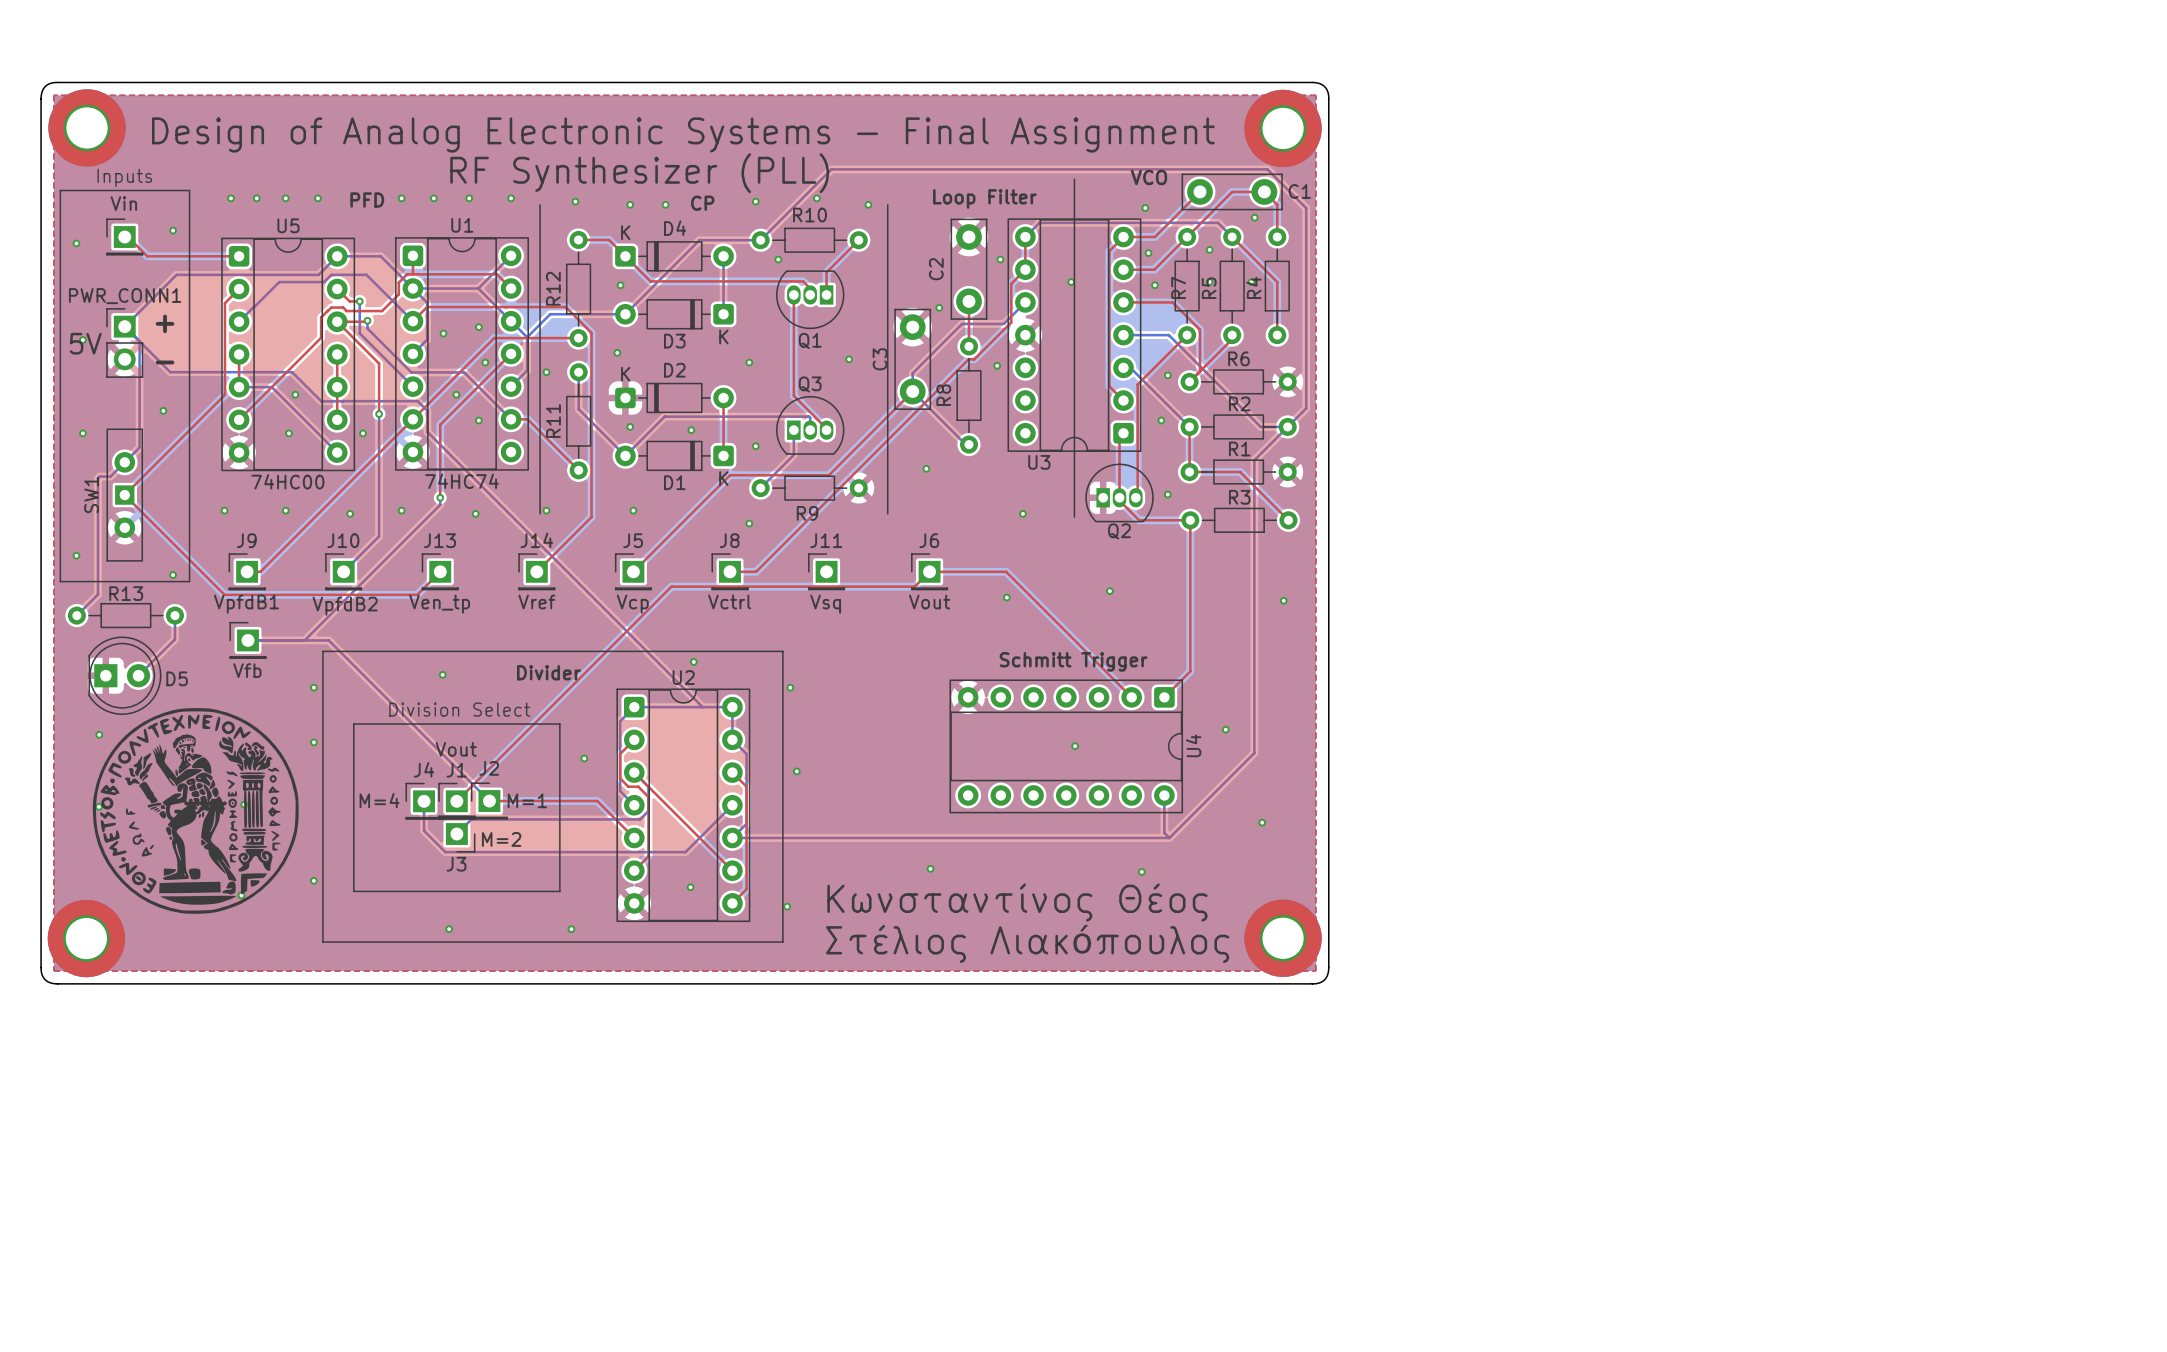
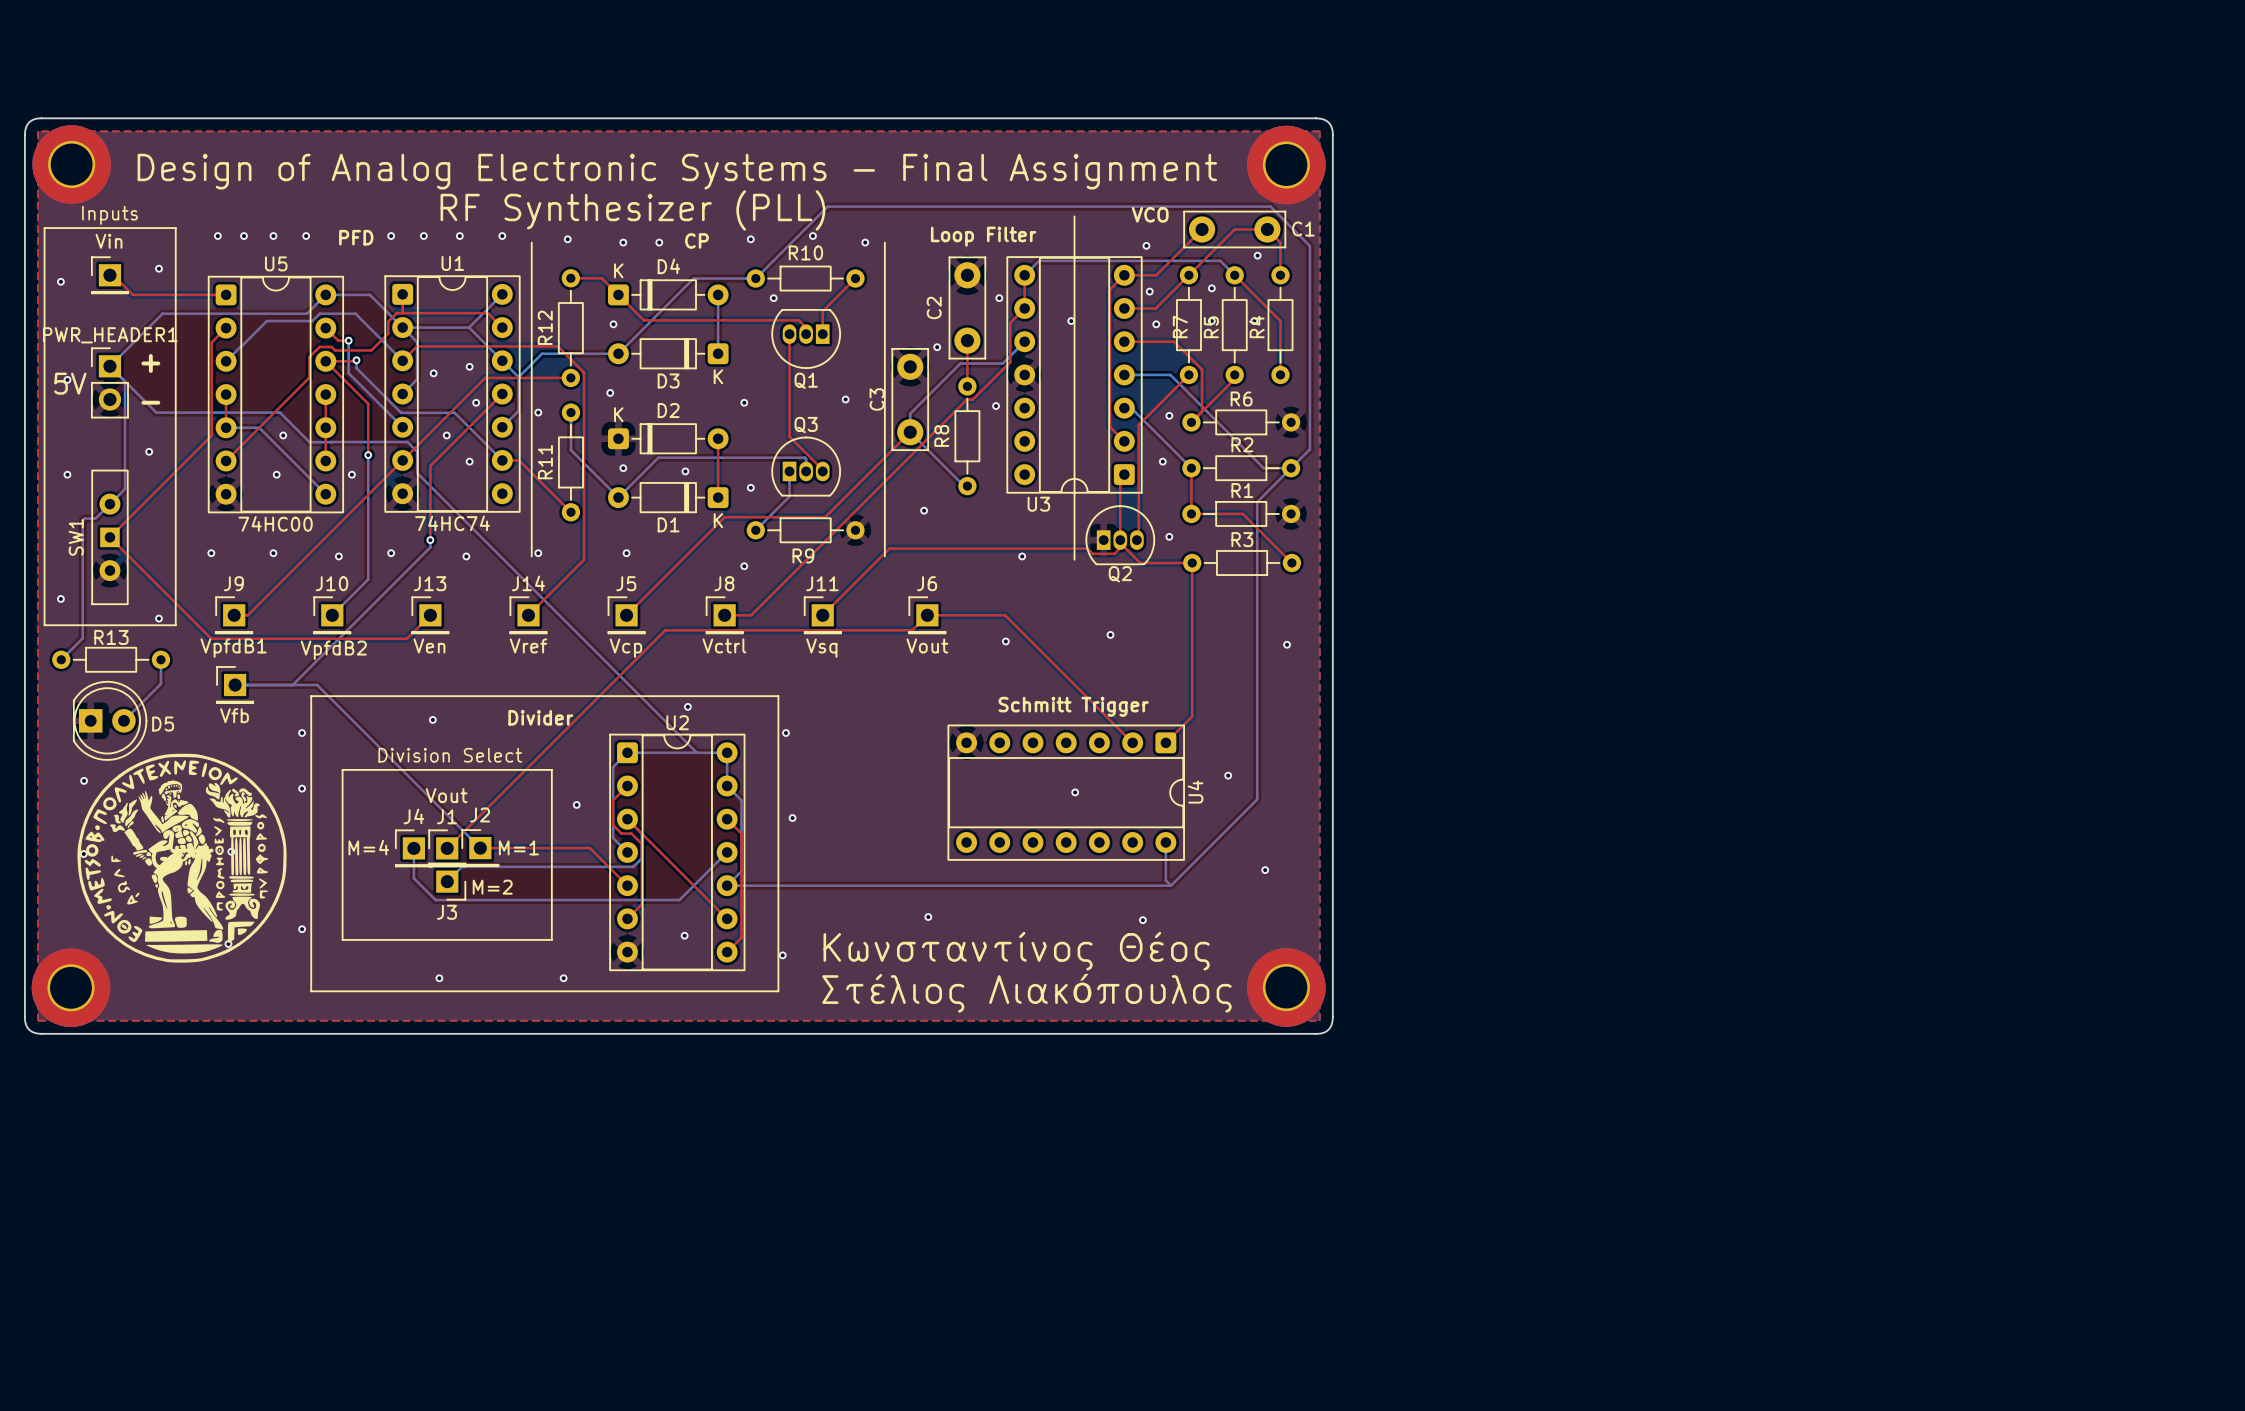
PWR_CONN1 name: PWR_CONN1 (125, 296) -> PWR_HEADER1 (110, 335)
top track: none -> (1120, 543) (1120, 548) (1114, 553) (1092, 553) (1087, 548) (889, 548) (822, 615)
J13 value: Ven_tp (439, 604) -> Ven (429, 645)

